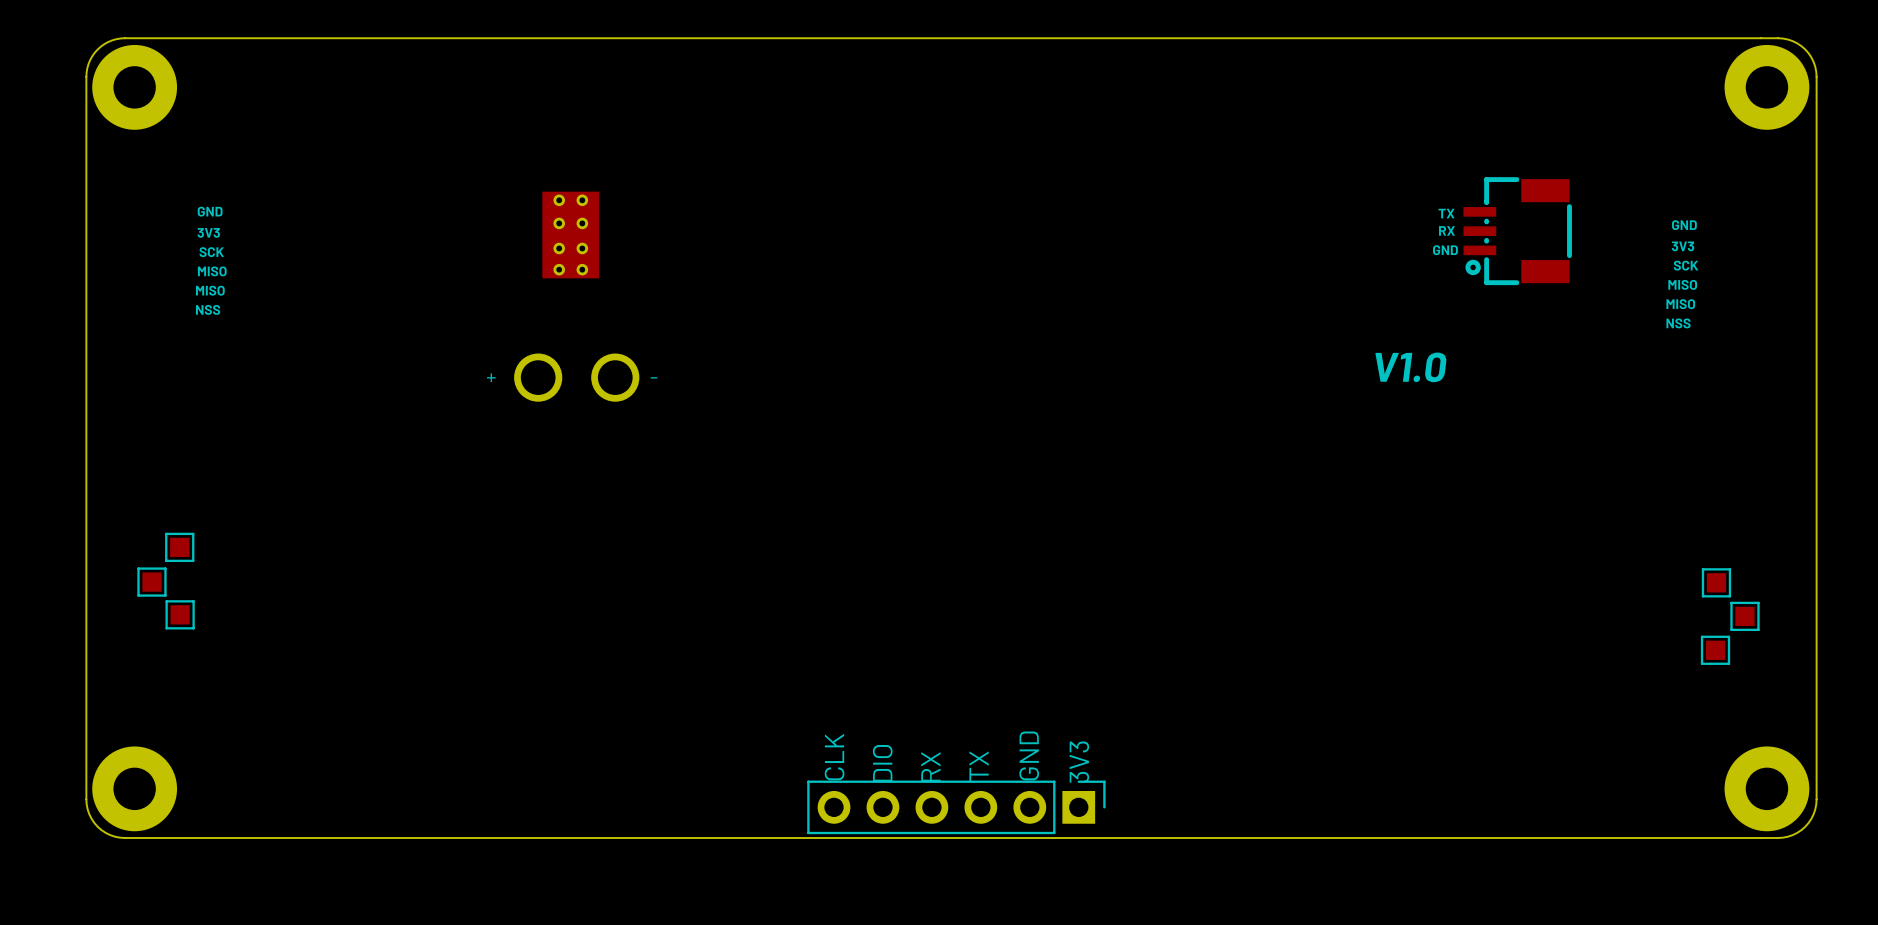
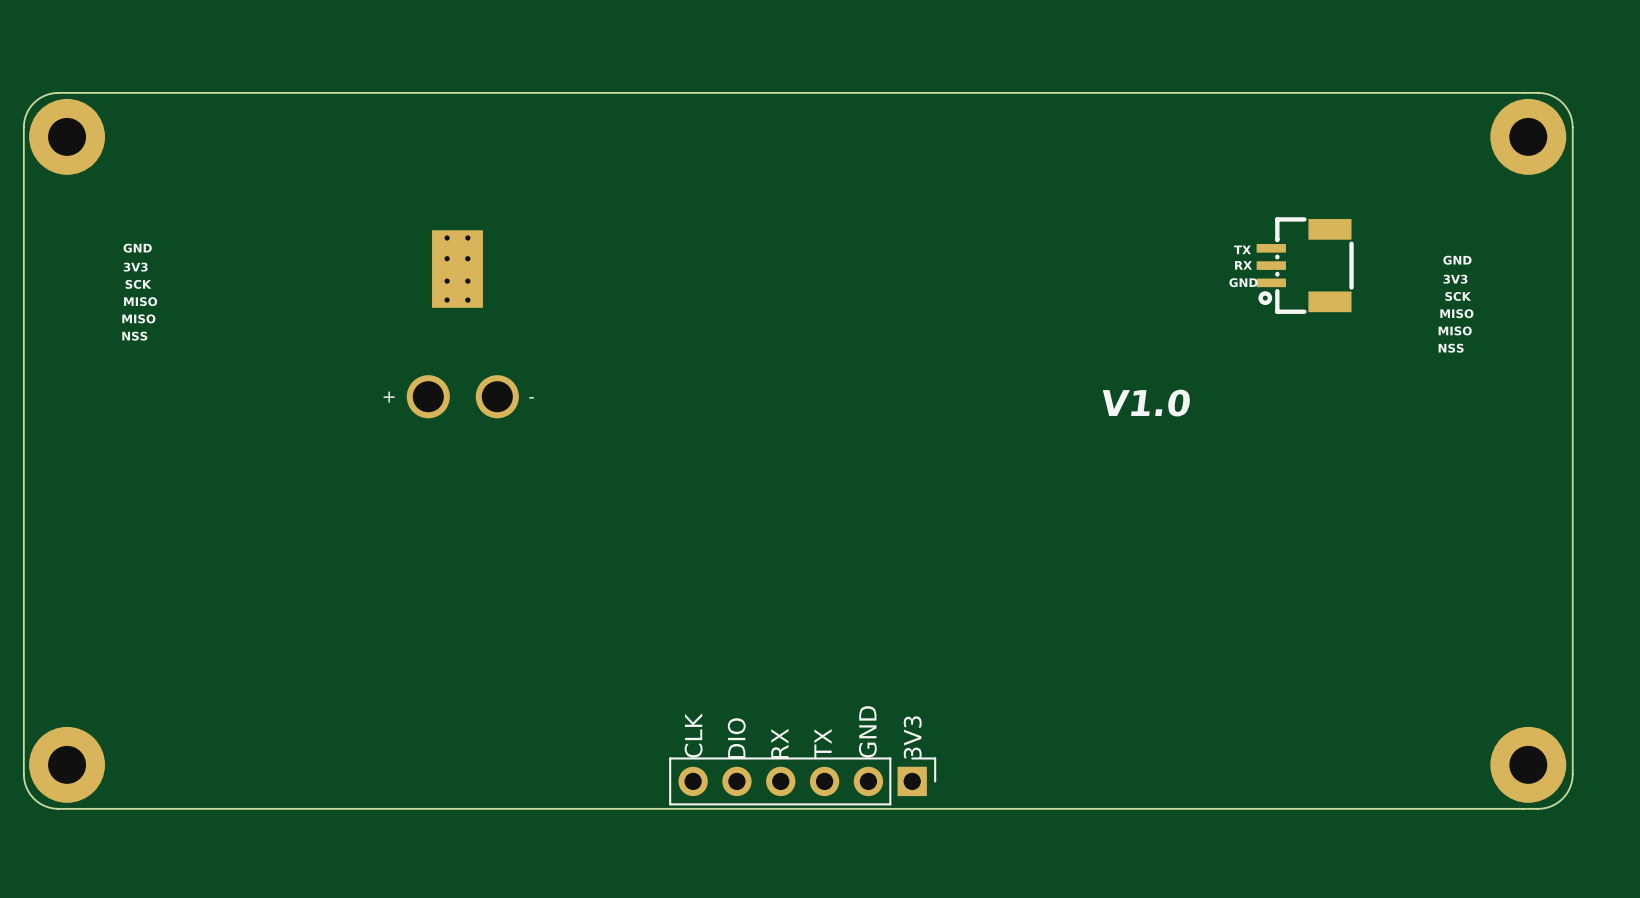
text position: V1.0 (1411, 367) -> V1.0 (1146, 403)
part: (179, 547) -> none
part: (151, 582) -> none
part: (1716, 582) -> none
part: (180, 614) -> none
part: (1744, 616) -> none
part: (1715, 650) -> none

